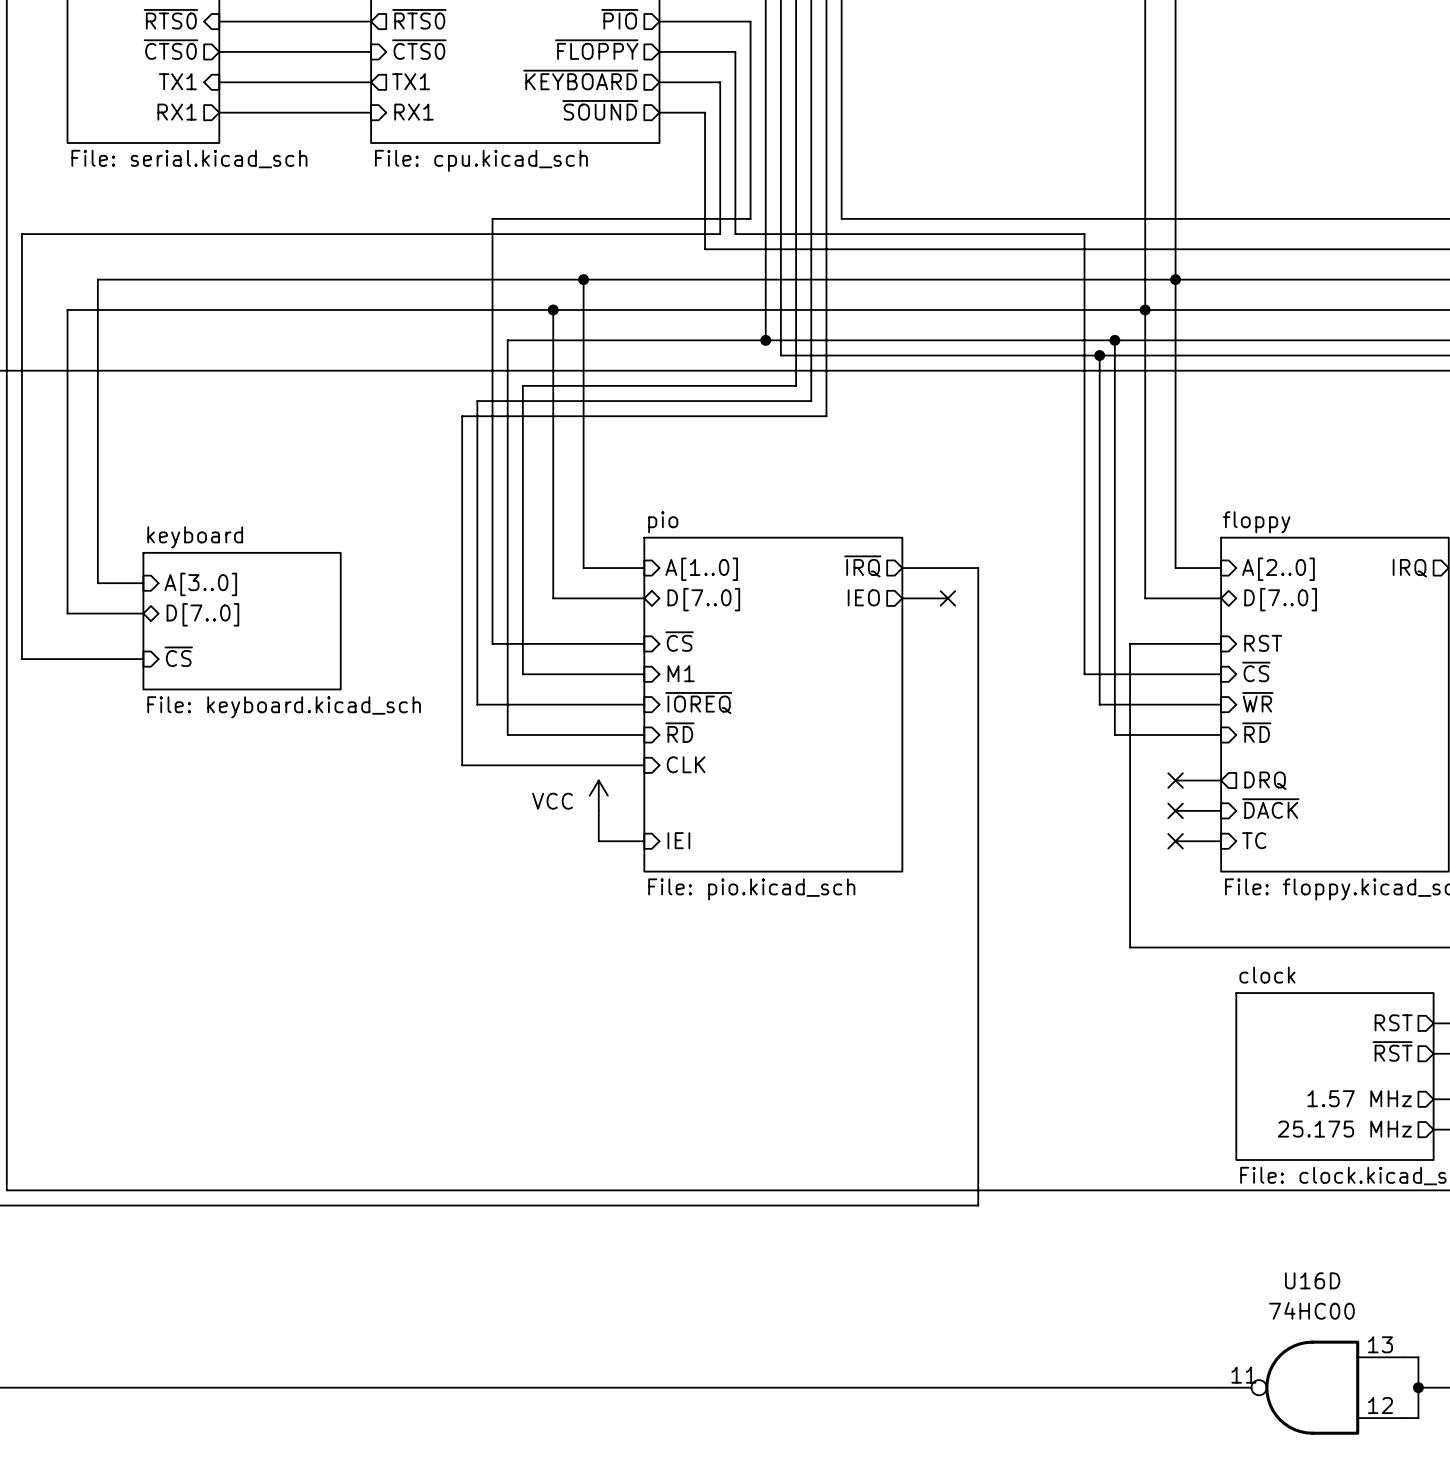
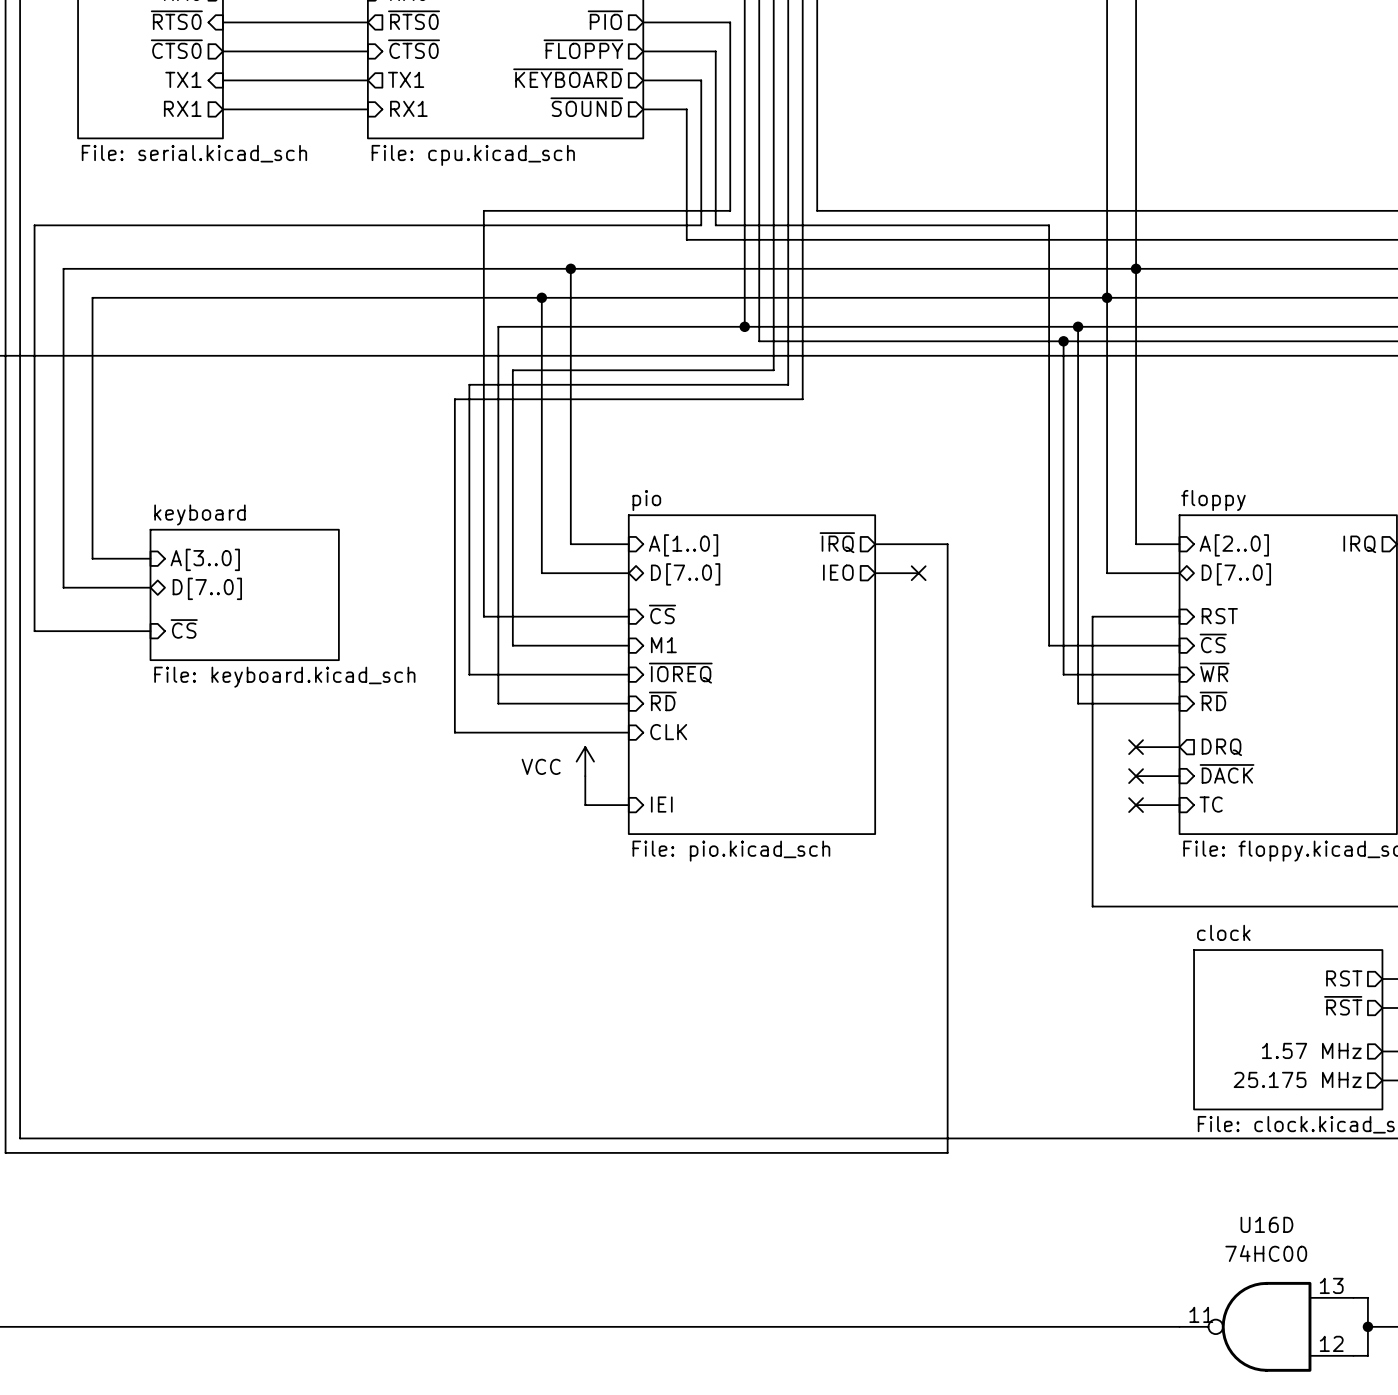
bus: (97, 279) (97, 583) -> (92, 297) (92, 558) (107, 558)
bus: (82, 309) (67, 309) (67, 613) -> (107, 268) (63, 268) (63, 587) (78, 587)

